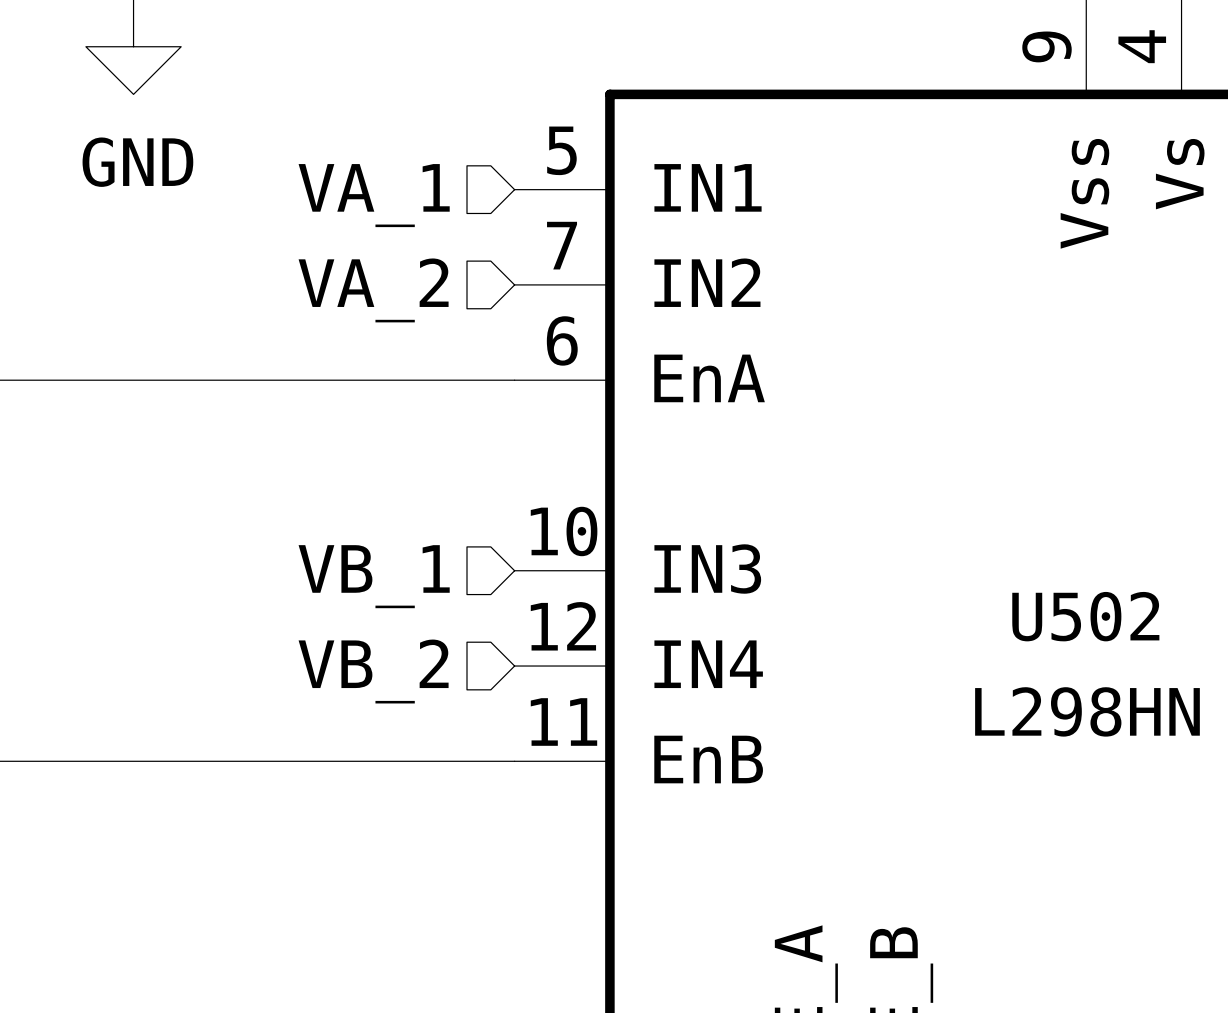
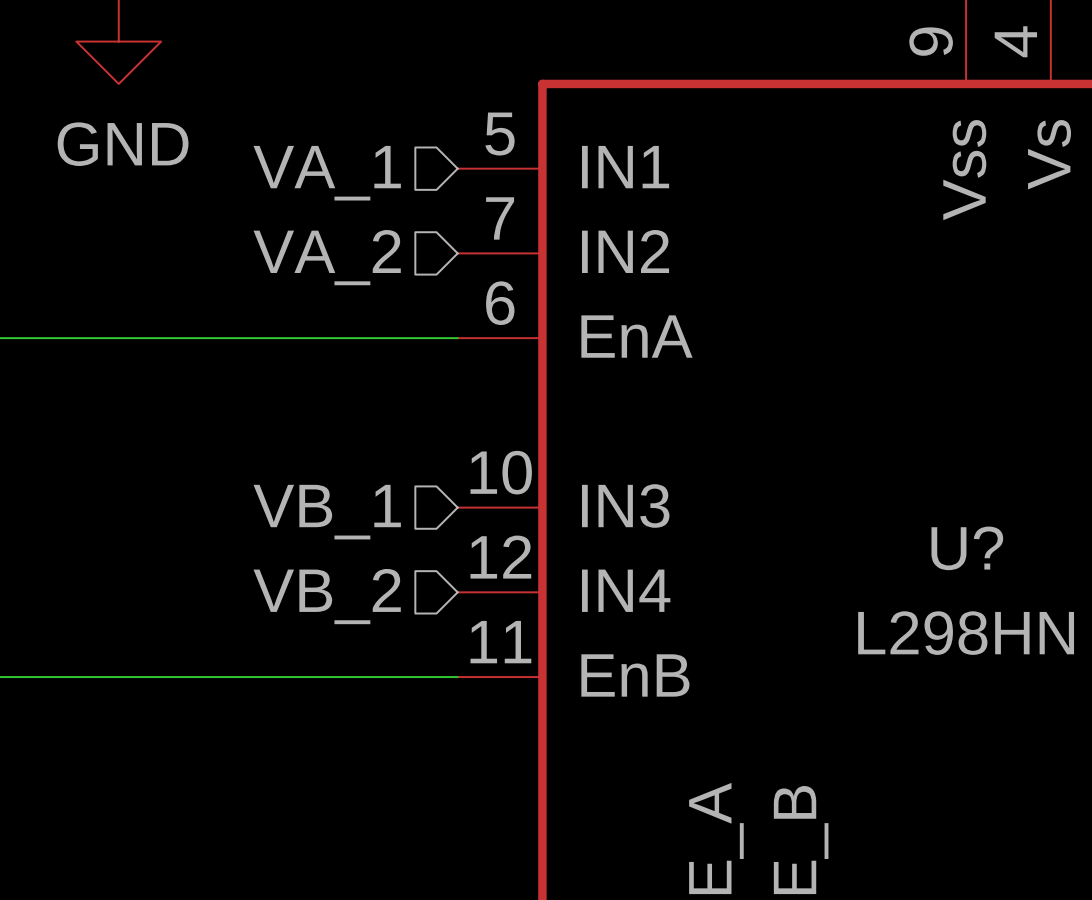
U502 name: U502 (1085, 616) -> U? (967, 548)

